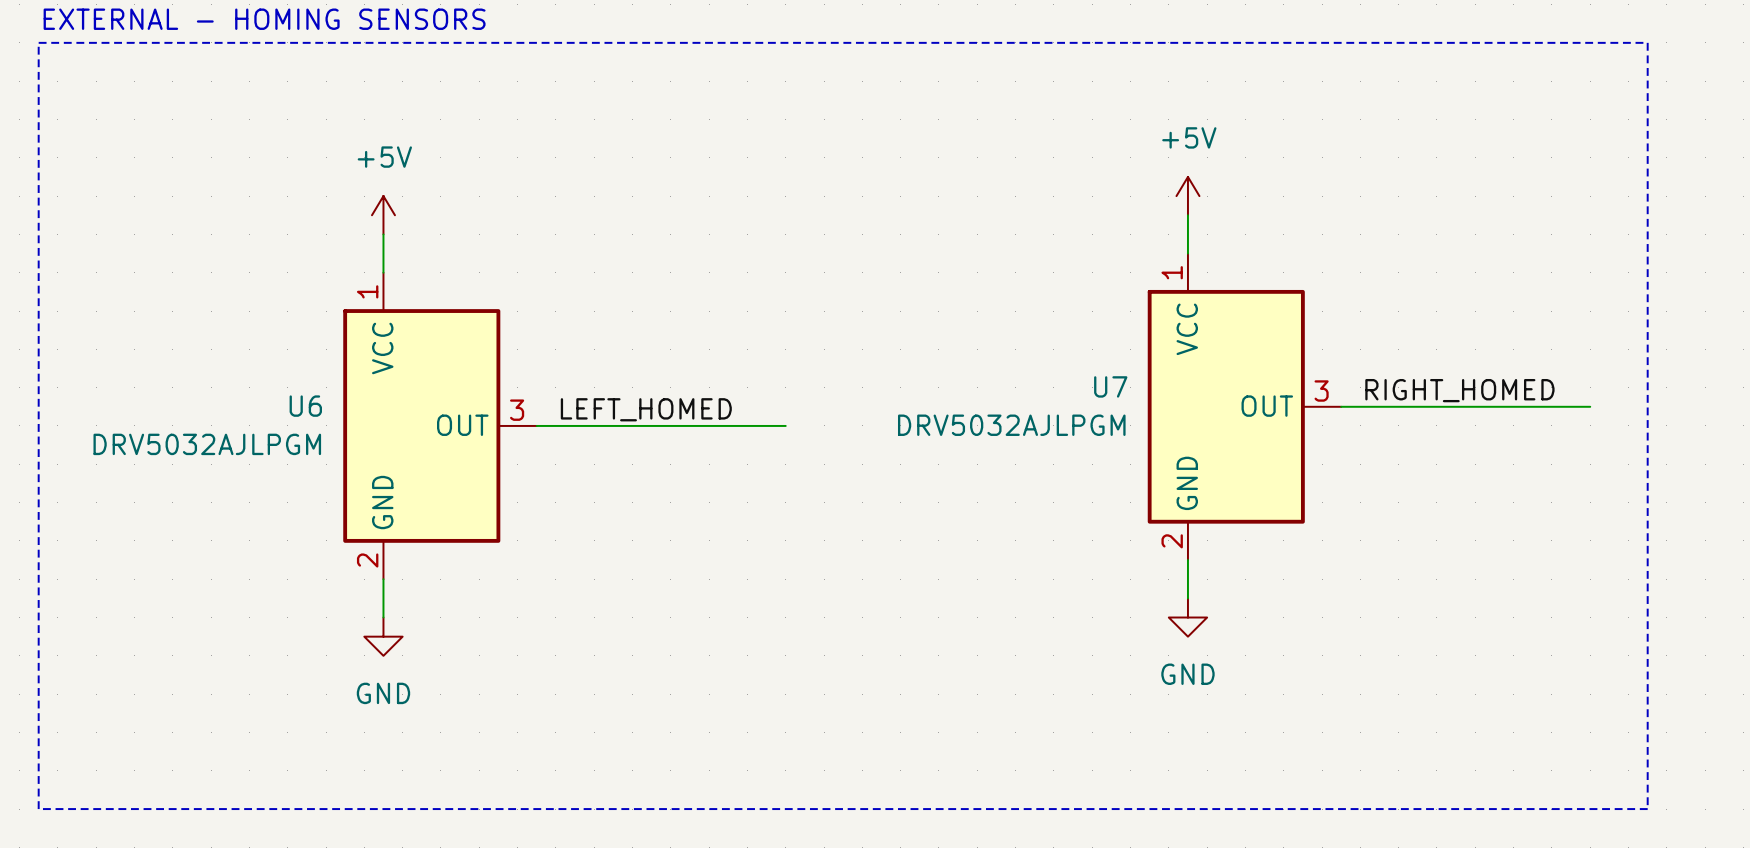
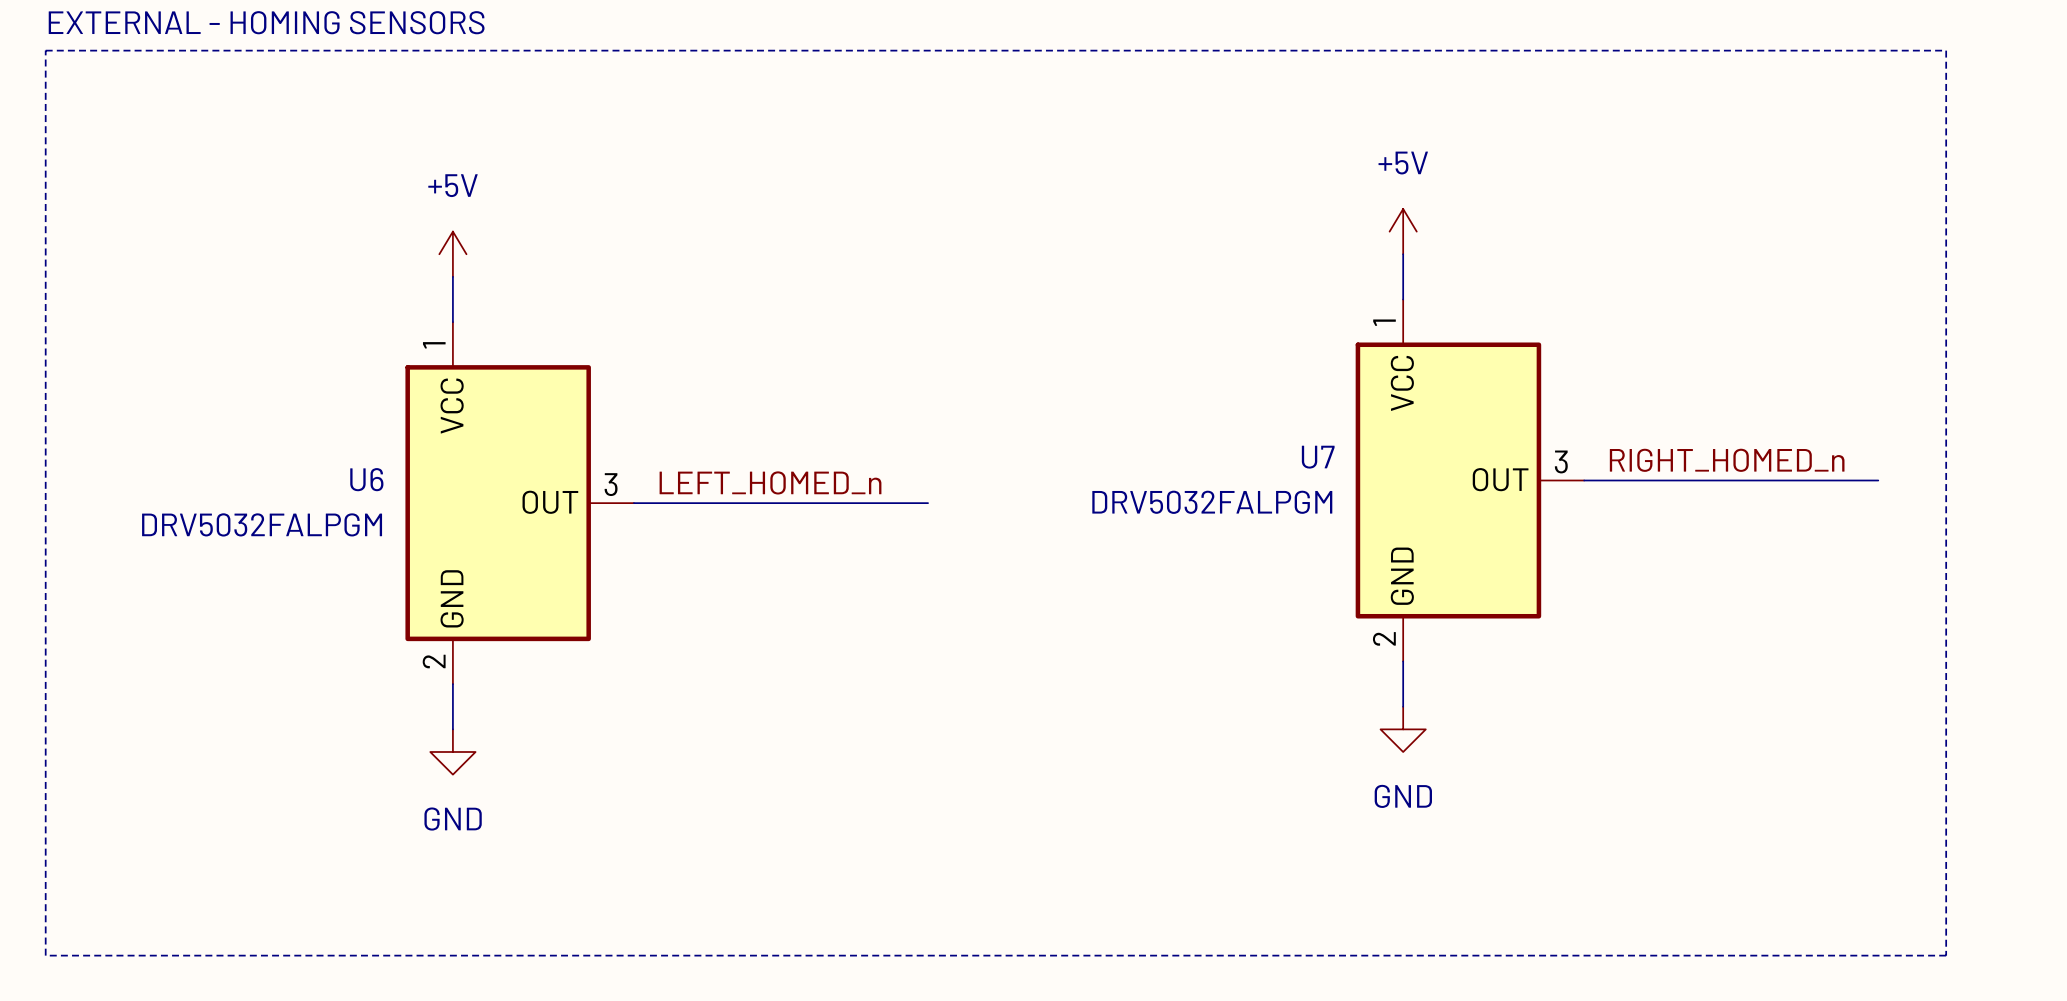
label: RIGHT_HOMED (1459, 390) -> RIGHT_HOMED_n (1727, 460)
label: LEFT_HOMED (646, 409) -> LEFT_HOMED_n (770, 482)
U7 value: DRV5032AJLPGM (1011, 425) -> DRV5032FALPGM (1212, 502)
U6 value: DRV5032AJLPGM (207, 444) -> DRV5032FALPGM (262, 524)

